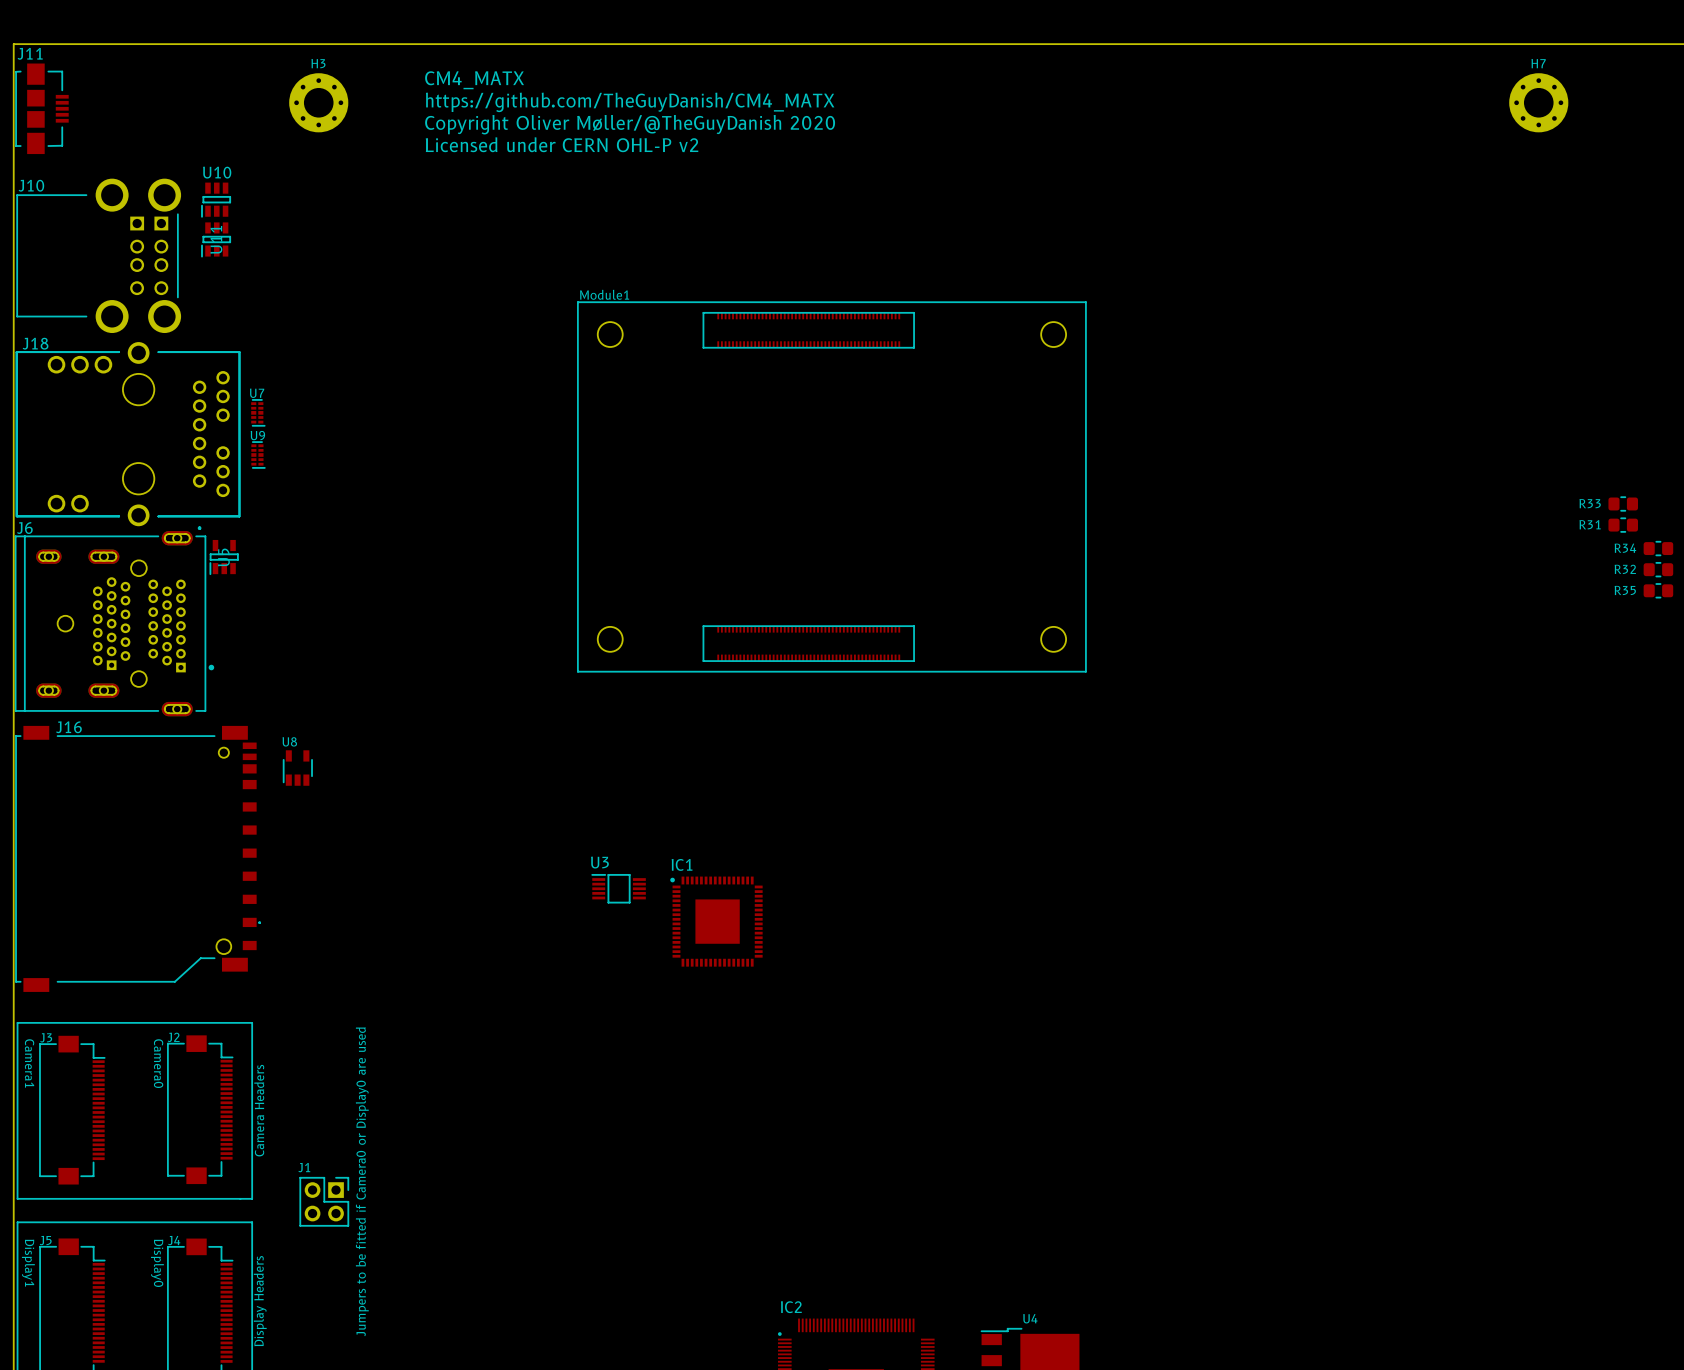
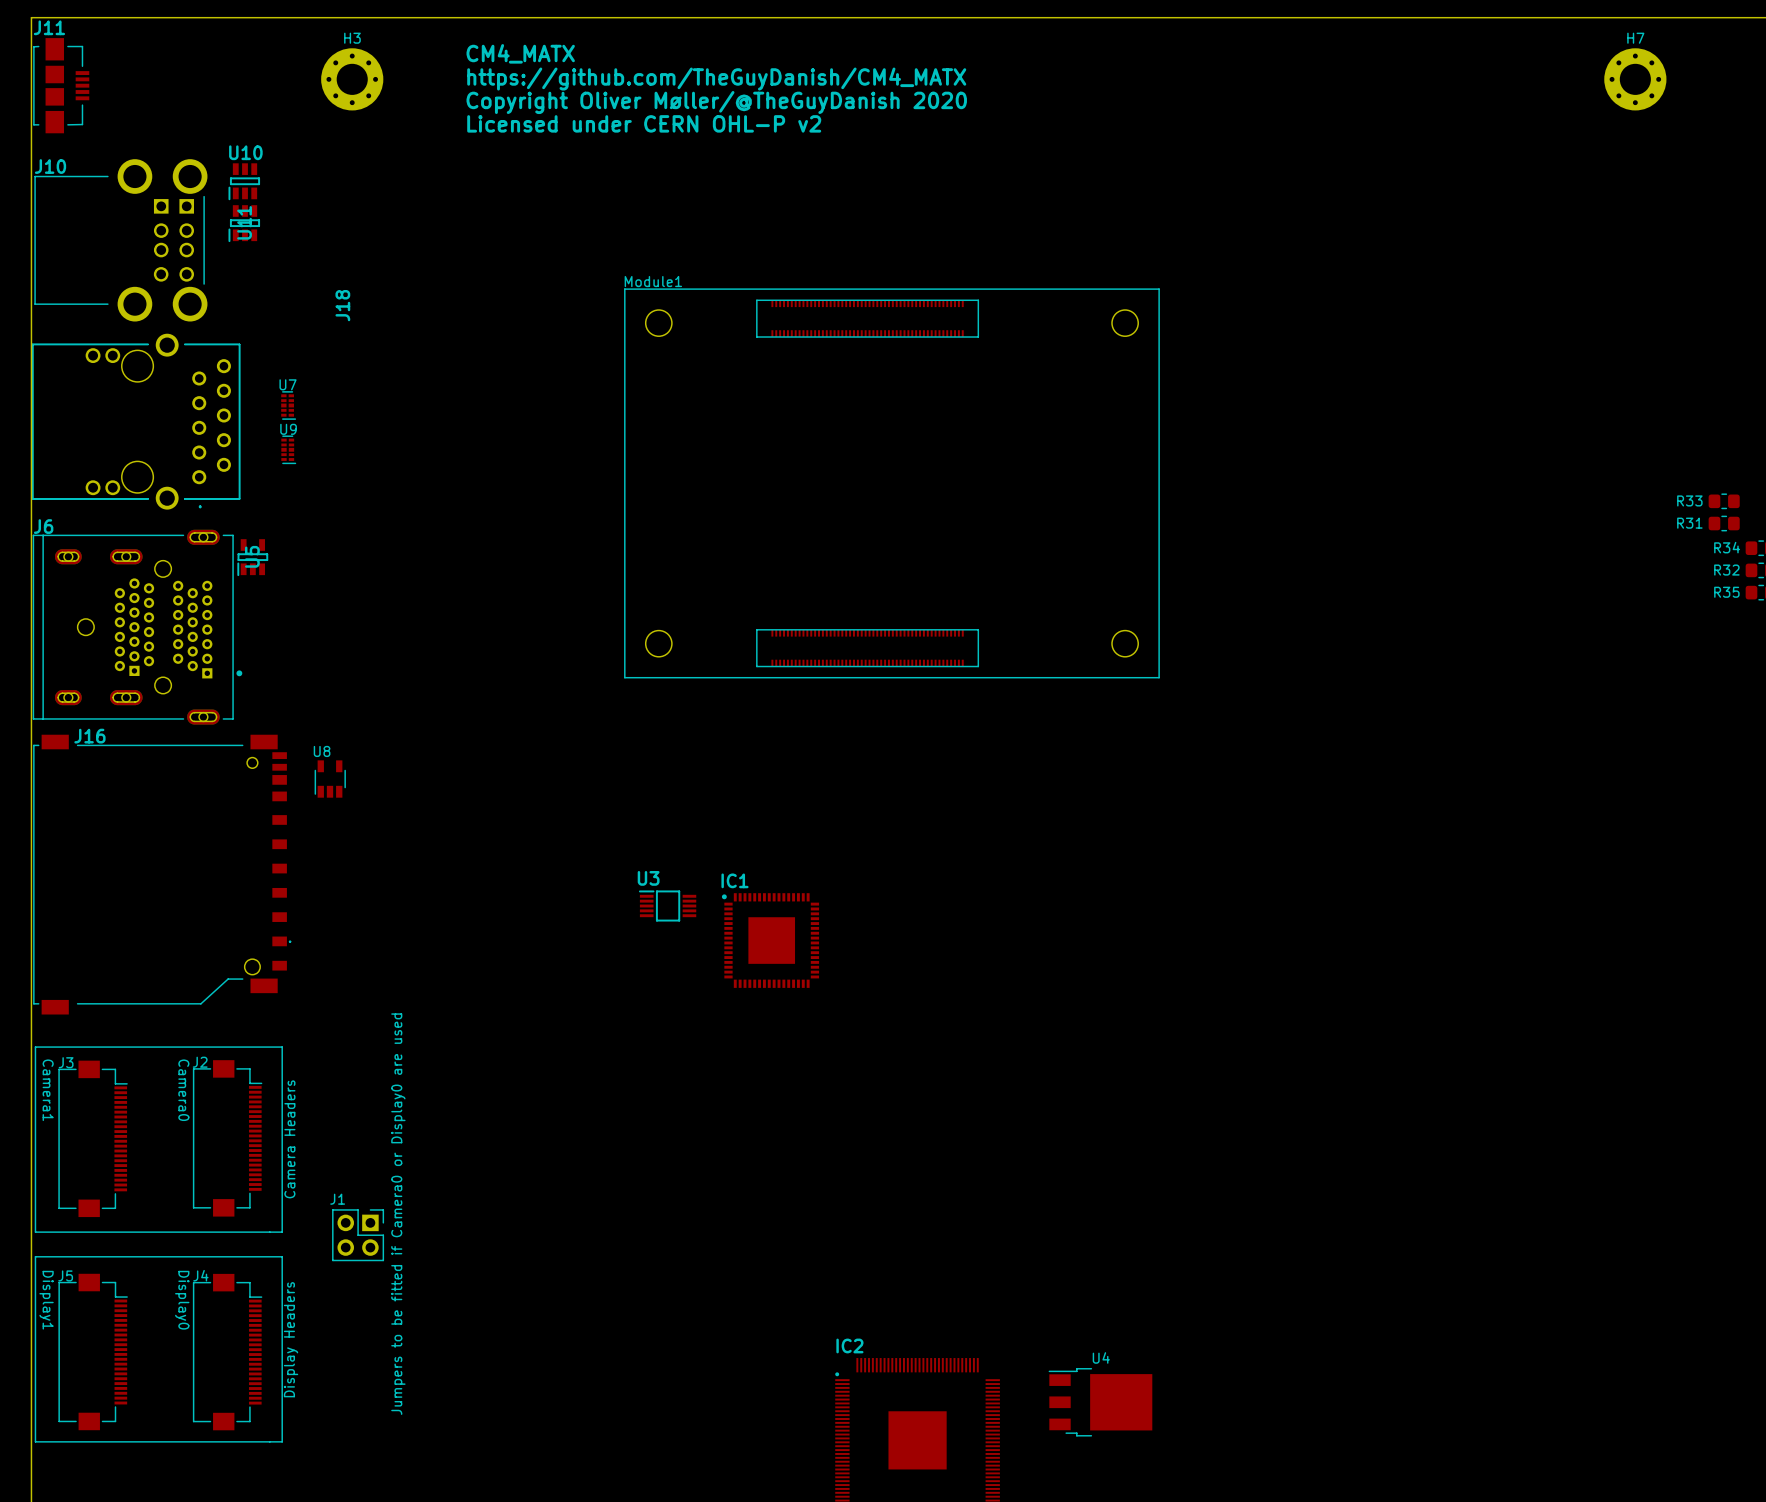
J18 footprint: [16, 342, 240, 530] -> [32, 333, 241, 510]
J18 name position: J18 (35, 343) -> J18 (342, 305)

